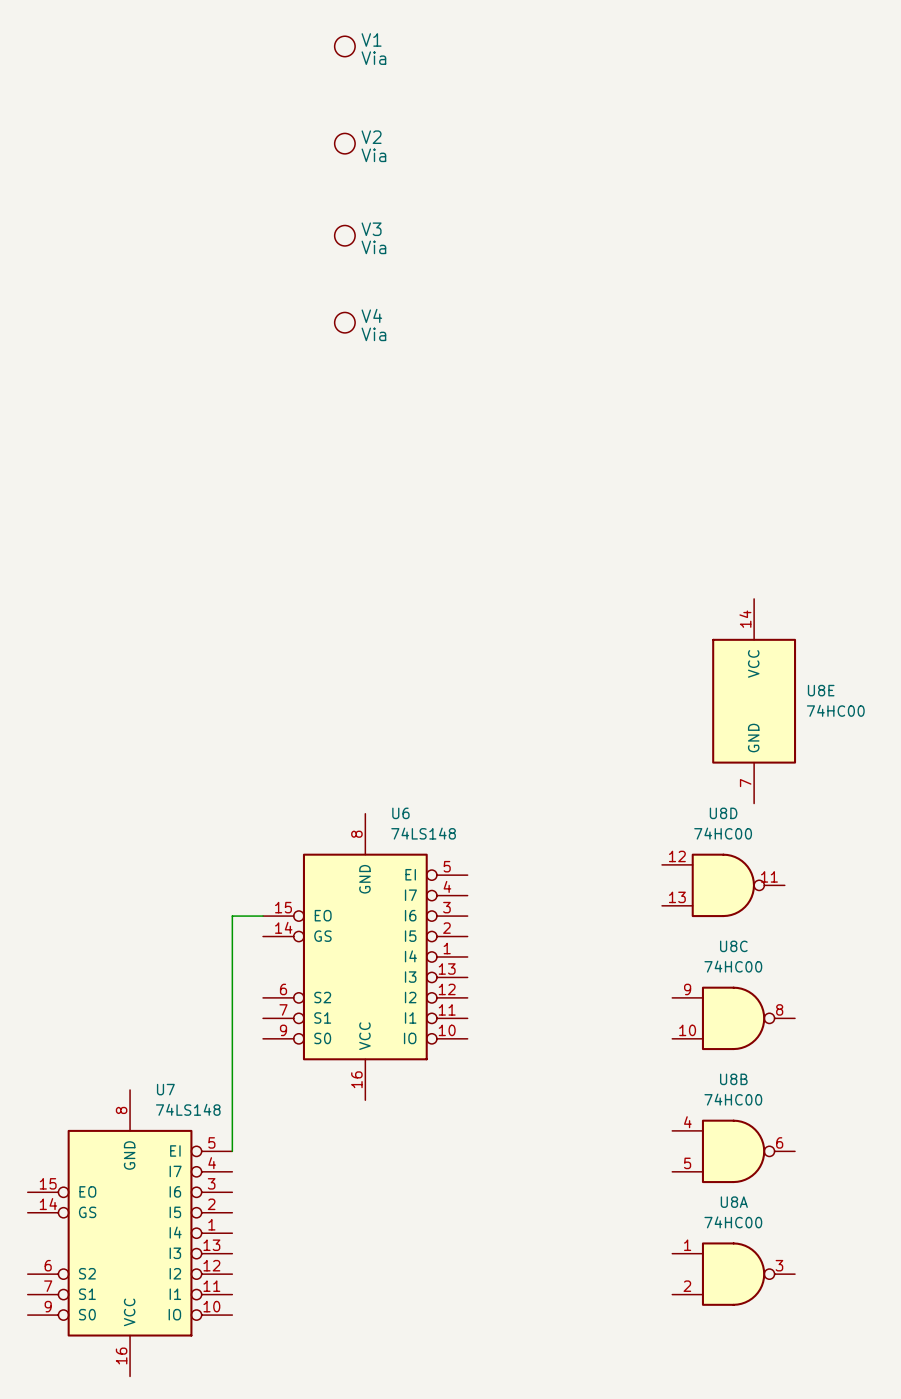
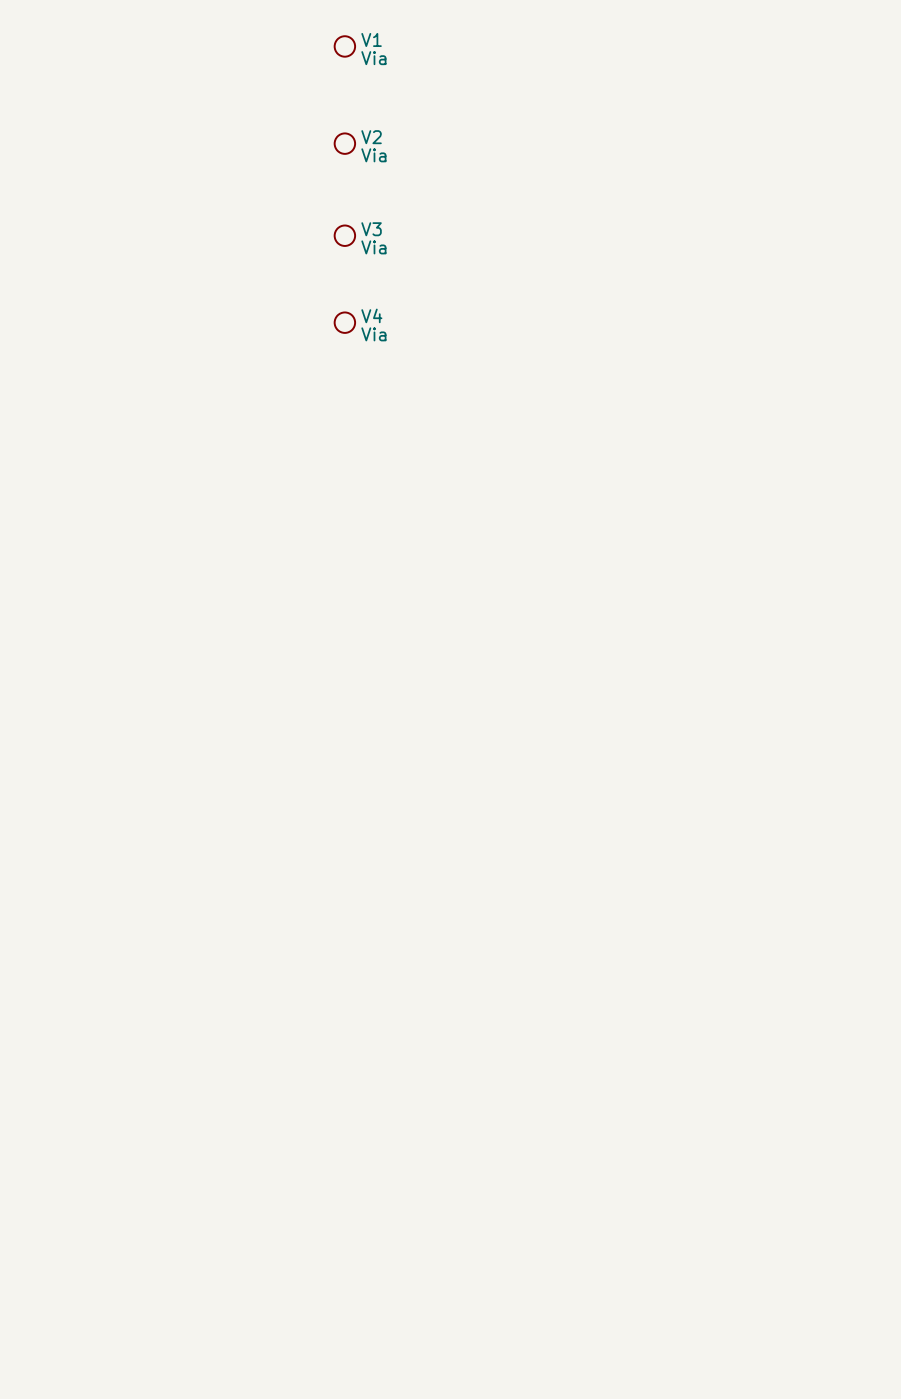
U8E: 74HC00 (754, 701) -> none
U8D: 74HC00 (723, 885) -> none
wire: (263, 916) (232, 916) (232, 1151) -> none
U6: 74LS148 (365, 956) -> none
U8C: 74HC00 (733, 1018) -> none
U8B: 74HC00 (733, 1151) -> none
U7: 74LS148 (130, 1233) -> none
U8A: 74HC00 (733, 1274) -> none

